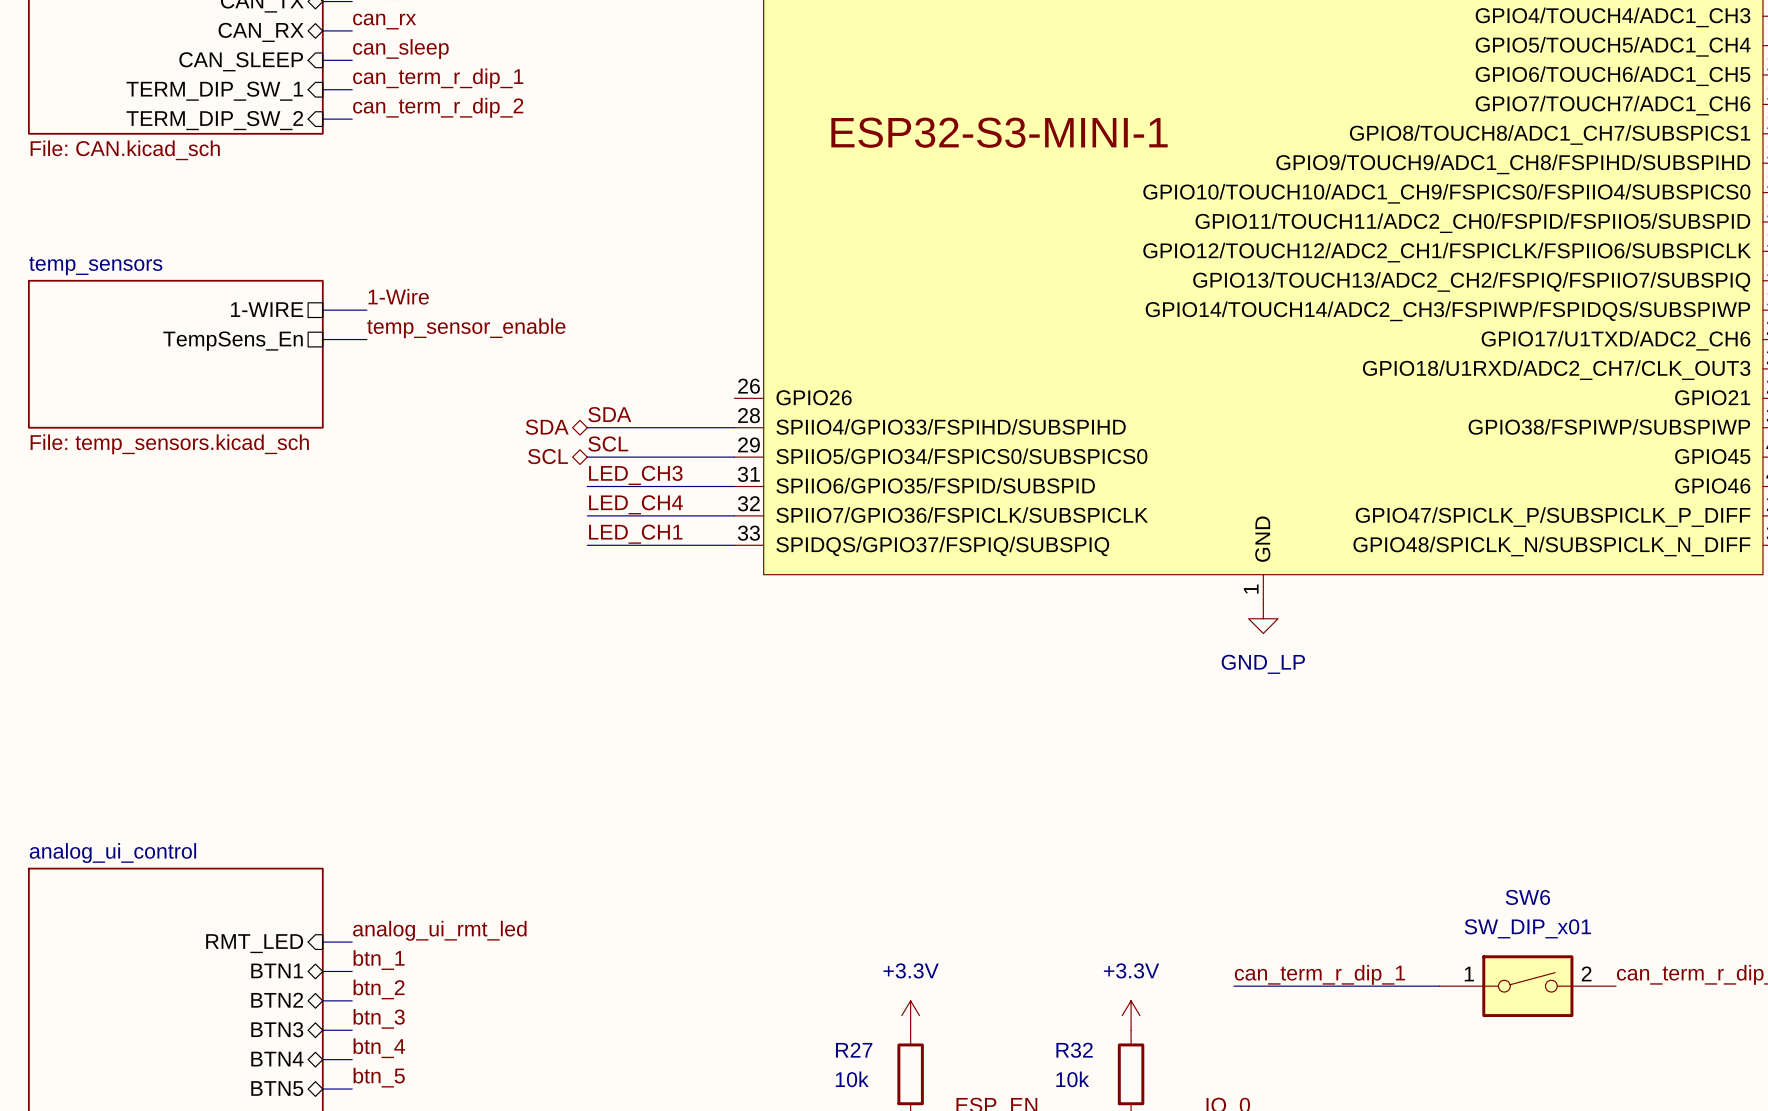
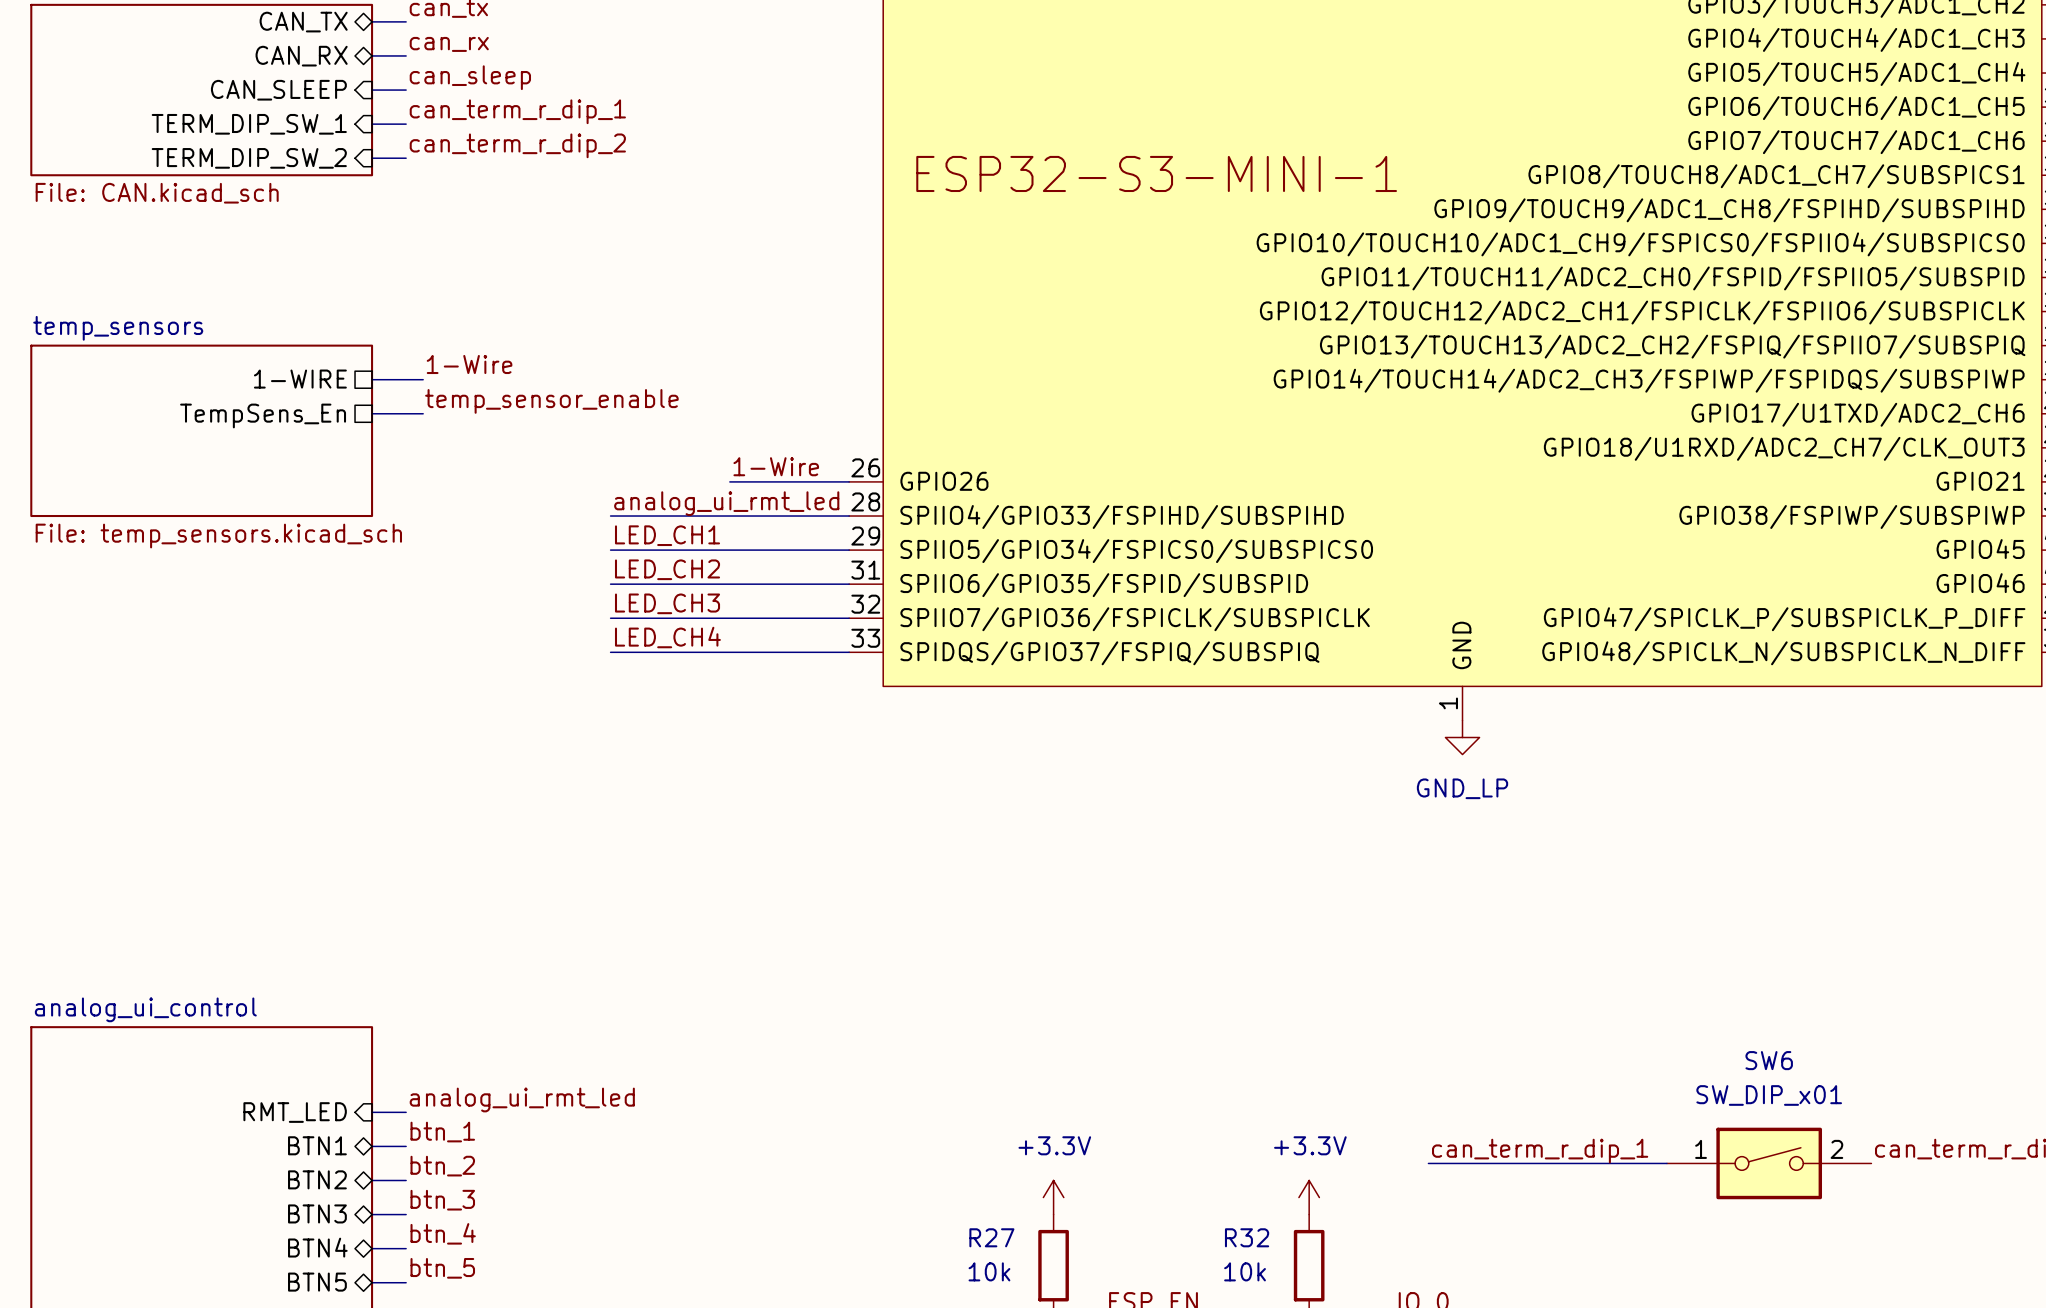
label: none -> 1-Wire (776, 466)
wire: none -> (729, 481) (849, 481)
label: SDA (609, 414) -> none
label: none -> analog_ui_rmt_led (726, 503)
wire: none -> (610, 516) (678, 516)
hierarchical label: SDA (547, 427) -> none
label: SCL (608, 443) -> none
hierarchical label: SCL (548, 456) -> none
wire: none -> (610, 550) (678, 550)
label: none -> LED_CH2 (667, 569)
label position: LED_CH3 (635, 475) -> LED_CH3 (667, 603)
wire: none -> (610, 584) (678, 584)
label position: LED_CH4 (635, 504) -> LED_CH4 (667, 637)
wire: none -> (610, 618) (678, 618)
label position: LED_CH1 (635, 534) -> LED_CH1 (667, 535)
wire: none -> (610, 652) (678, 652)

